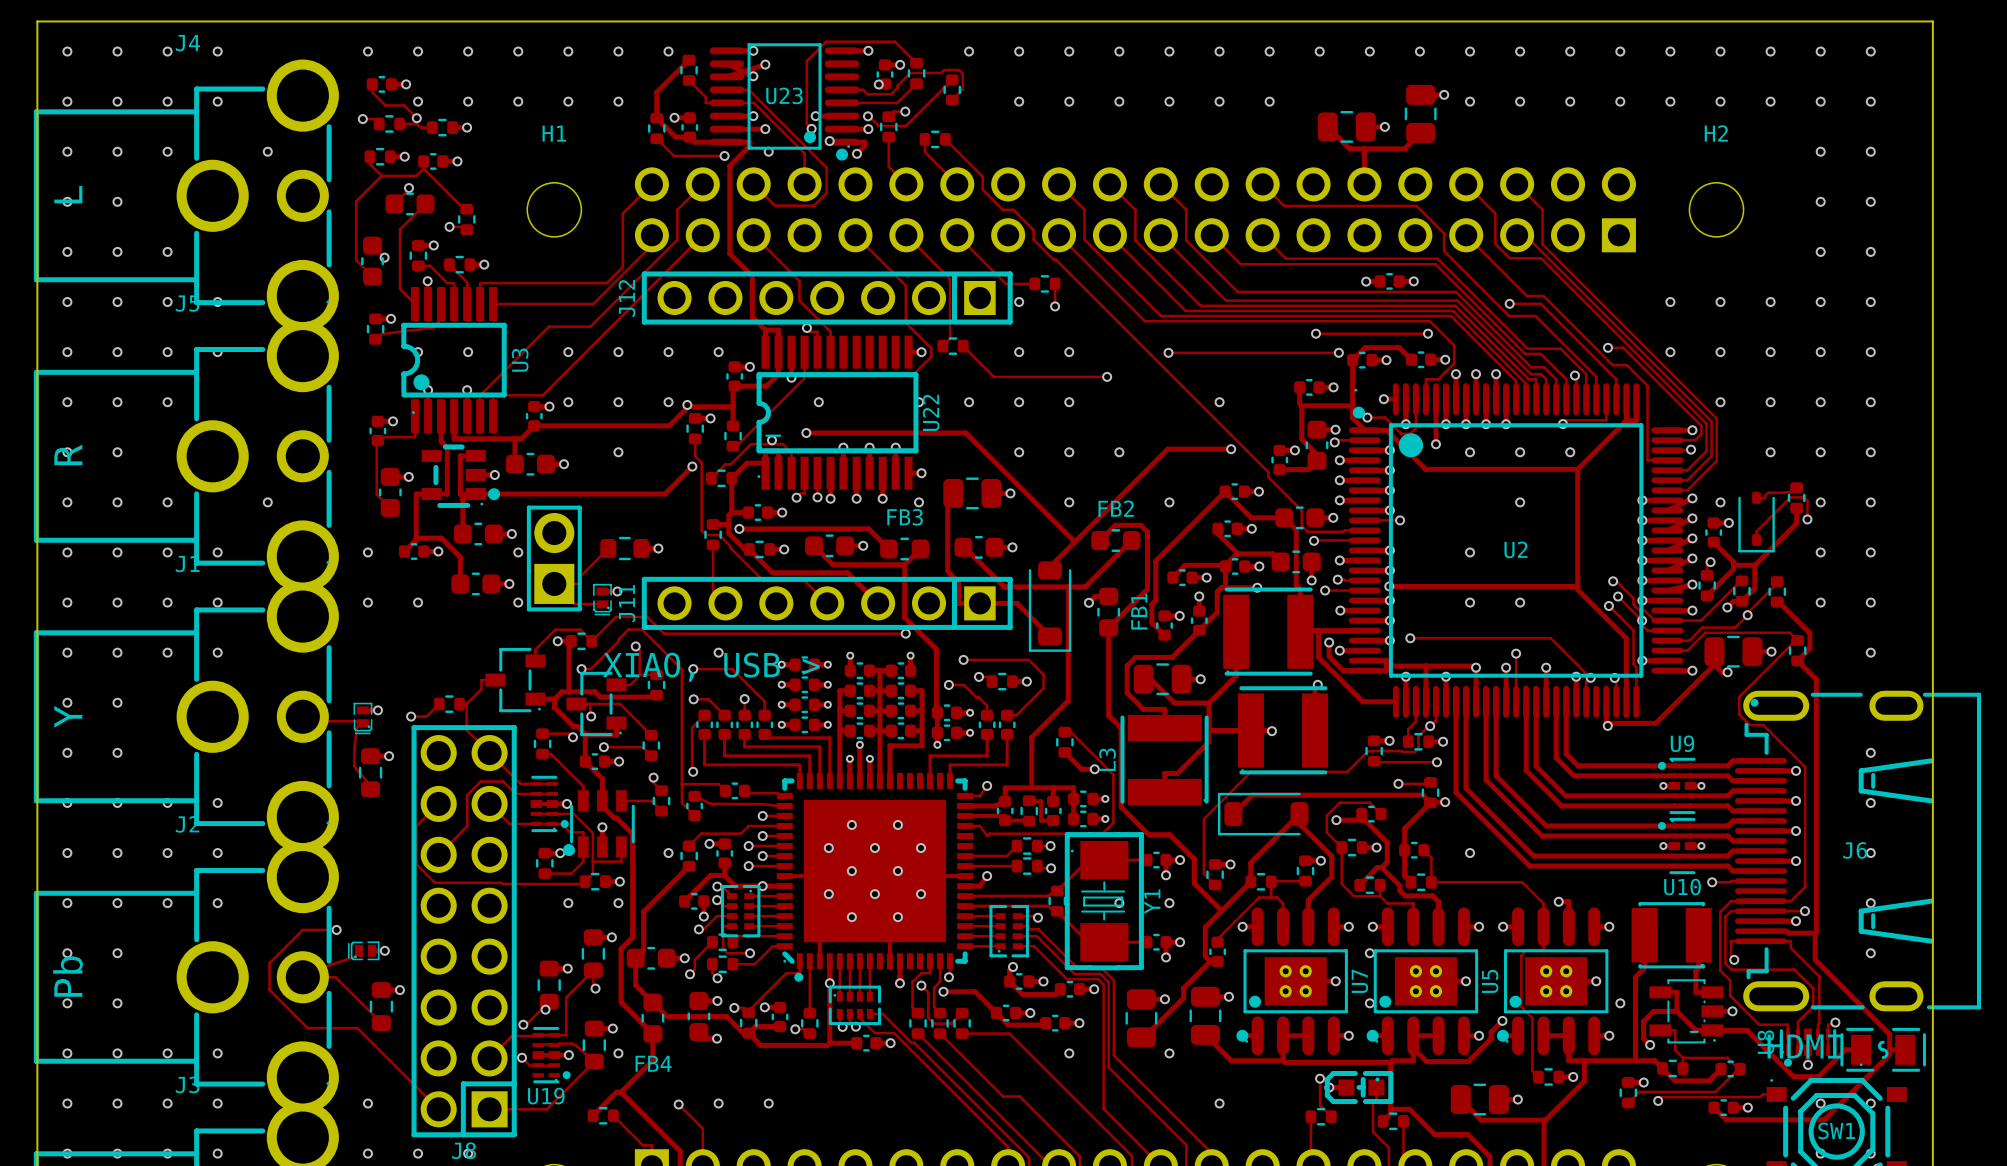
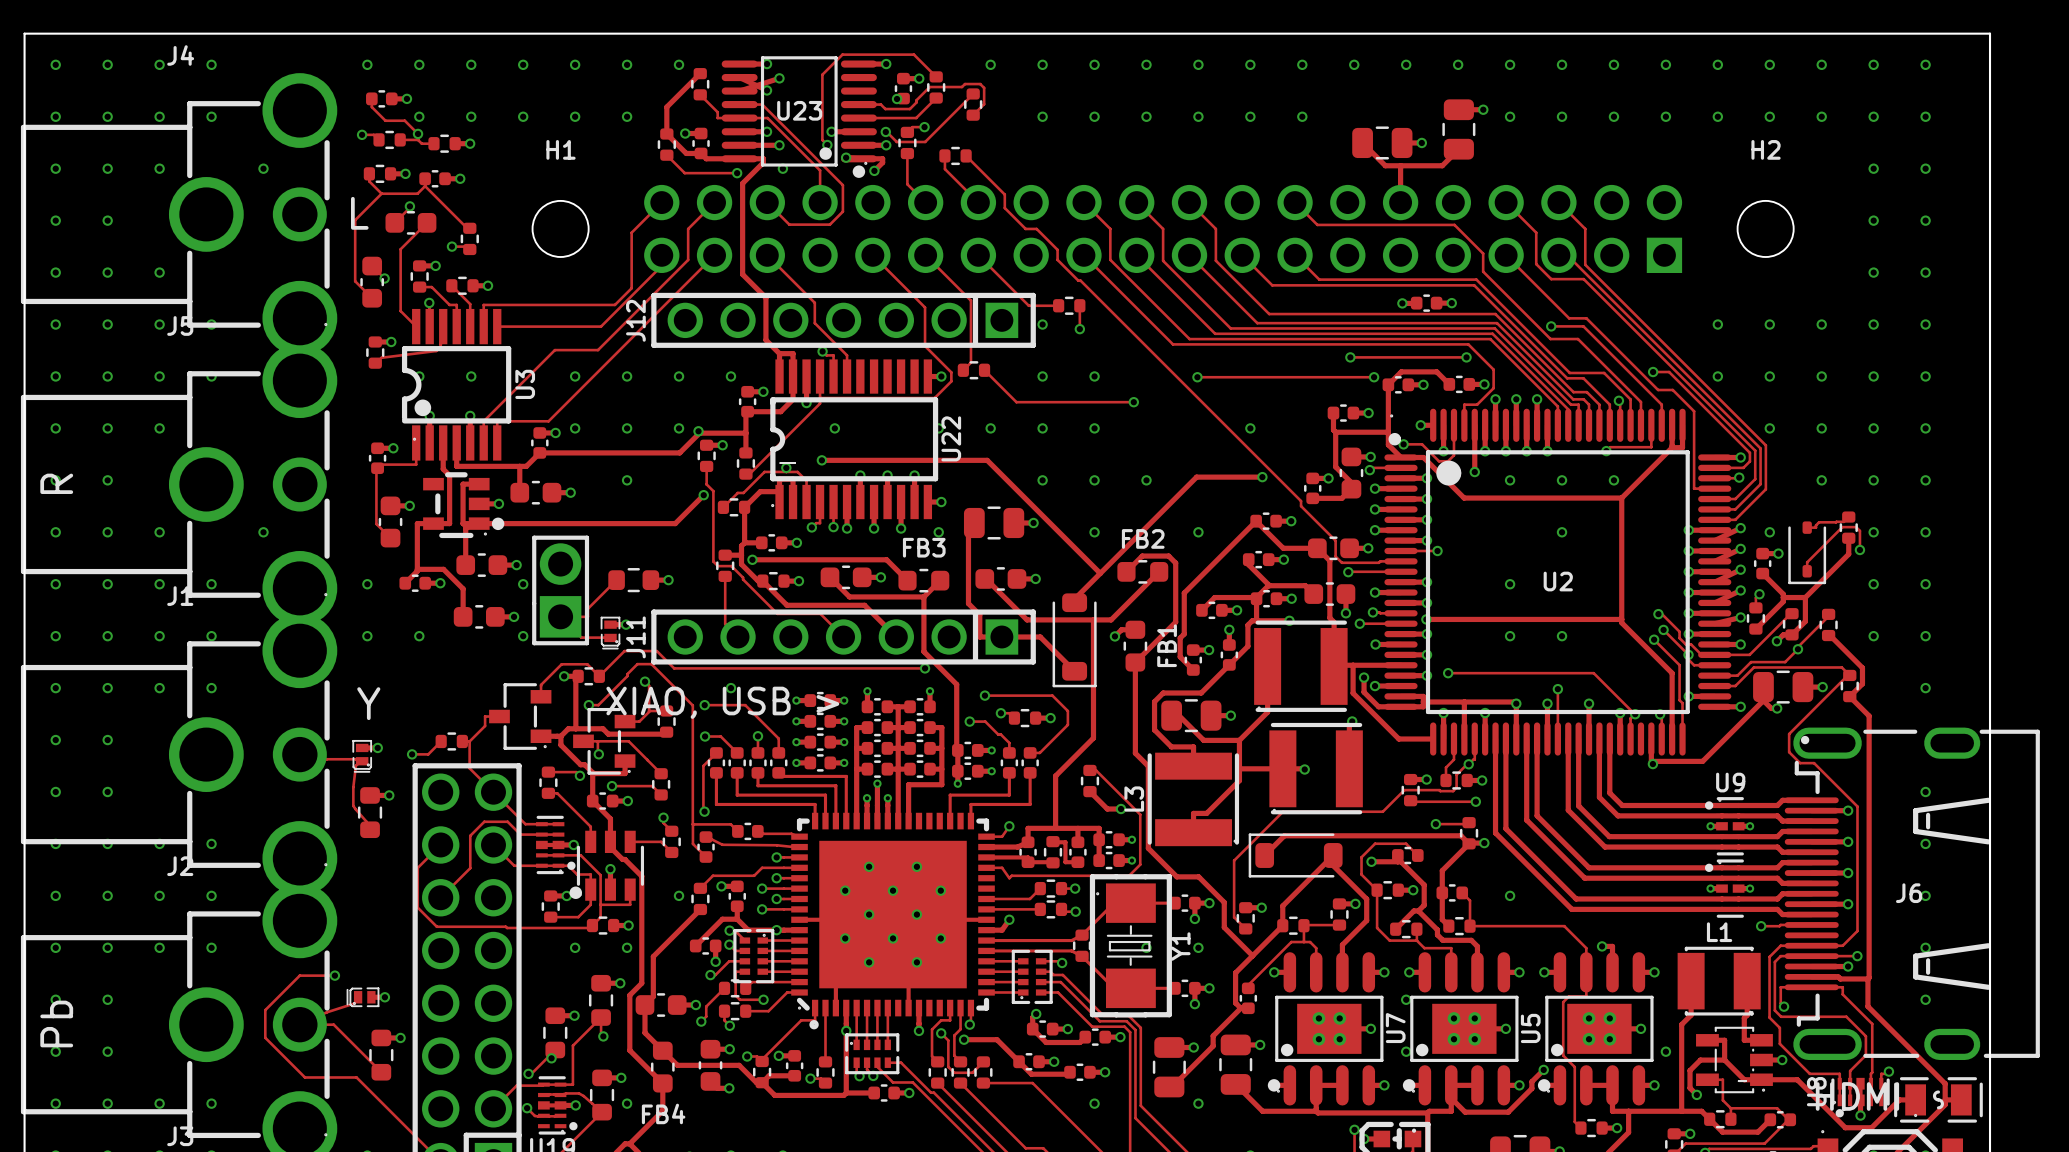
text rotation: 0° (68, 194) -> 90° clockwise (359, 213)
text position: L (68, 194) -> L (359, 213)
text rotation: 0° (68, 716) -> 90° clockwise (368, 703)
text position: Y (68, 716) -> Y (368, 703)
U10 name: U10 (1682, 887) -> none
L1 name: none -> L1 (1719, 932)

